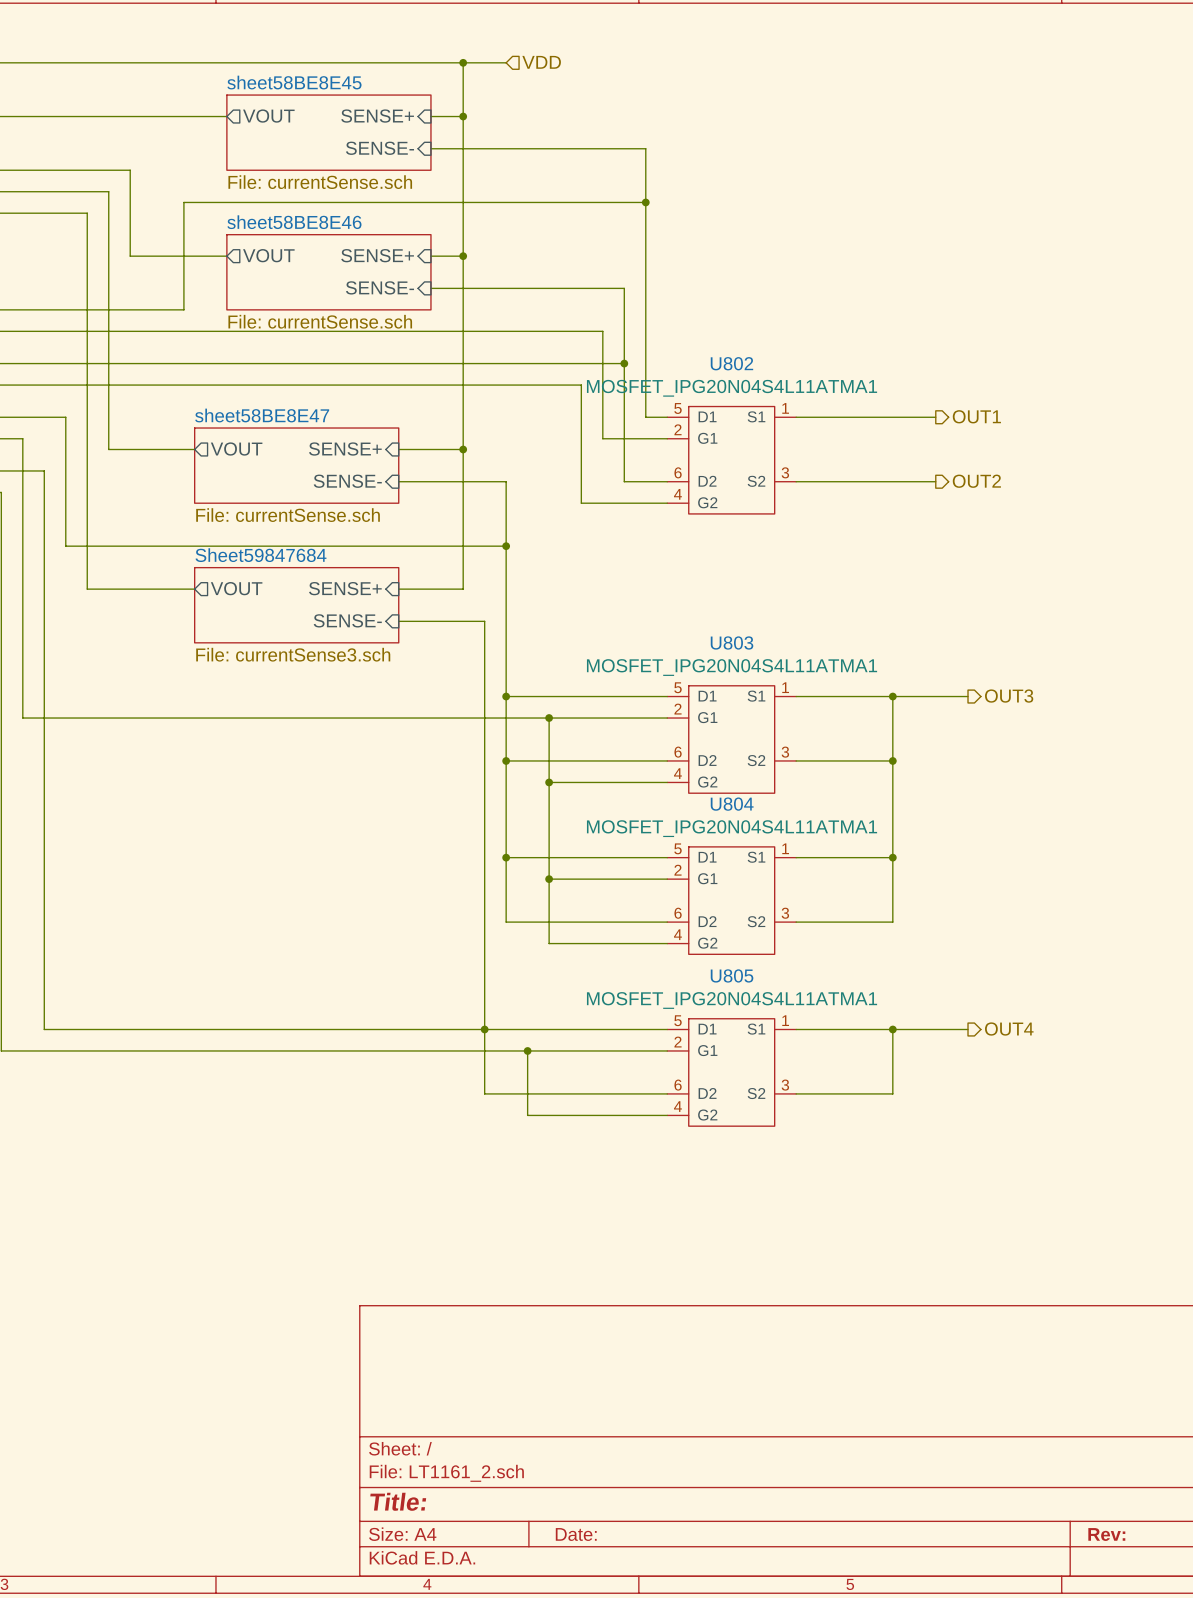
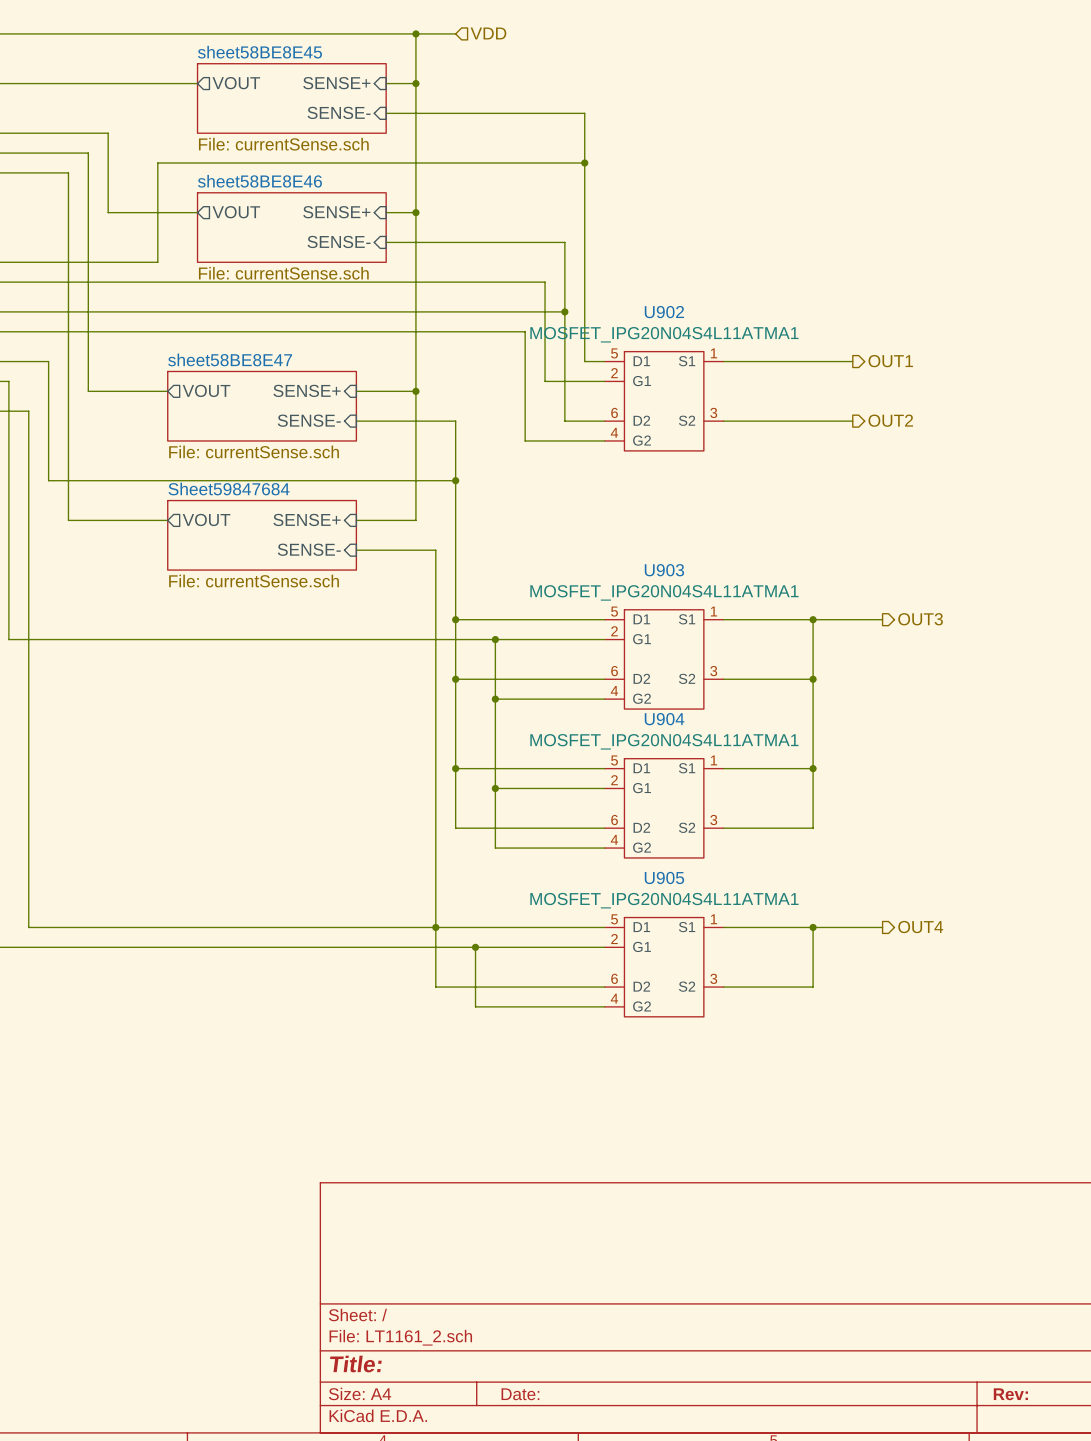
U802 name: U802 (731, 363) -> U902 (664, 312)
U803 name: U803 (732, 642) -> U903 (664, 570)
sheet Sheet59847684 value: File: currentSense3.sch (293, 654) -> File: currentSense.sch (254, 581)
U804 name: U804 (732, 804) -> U904 (664, 719)
U805 name: U805 (732, 975) -> U905 (664, 877)

